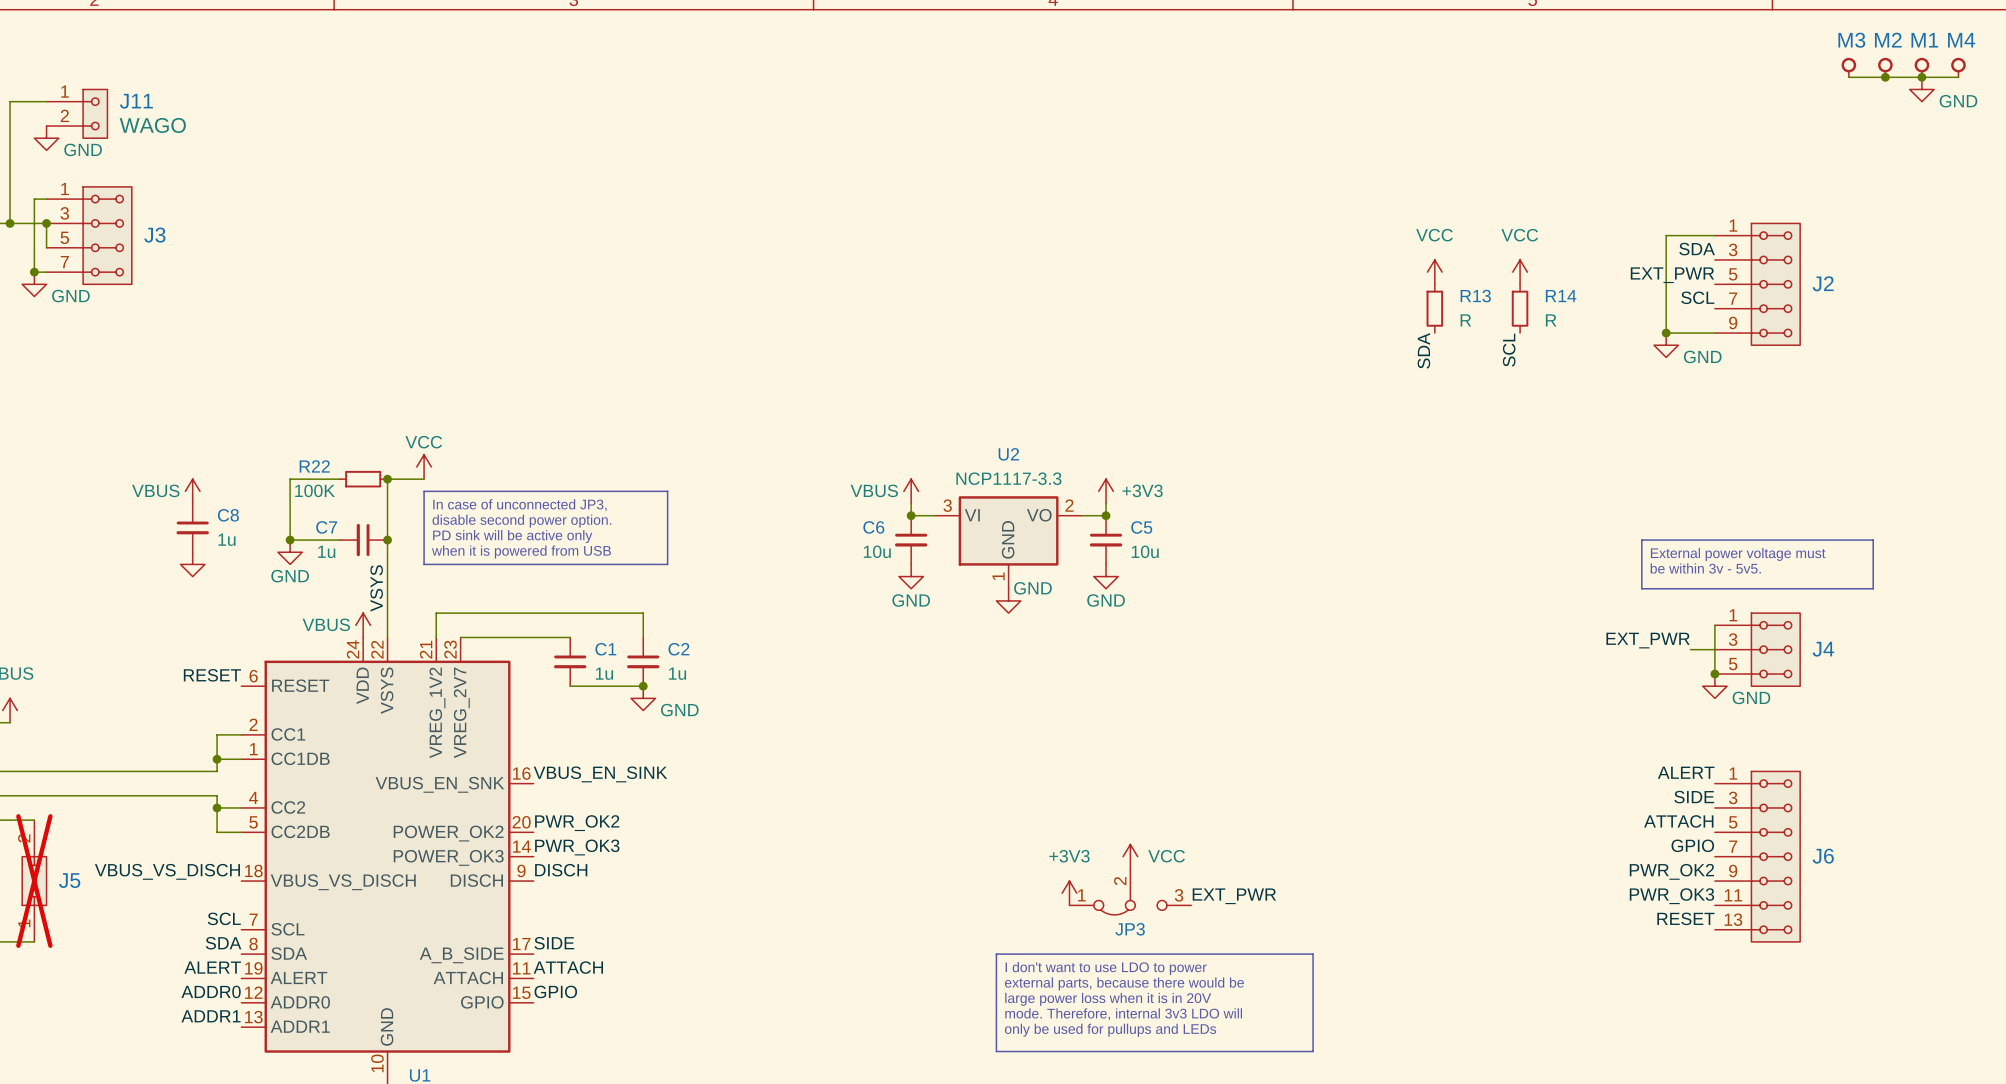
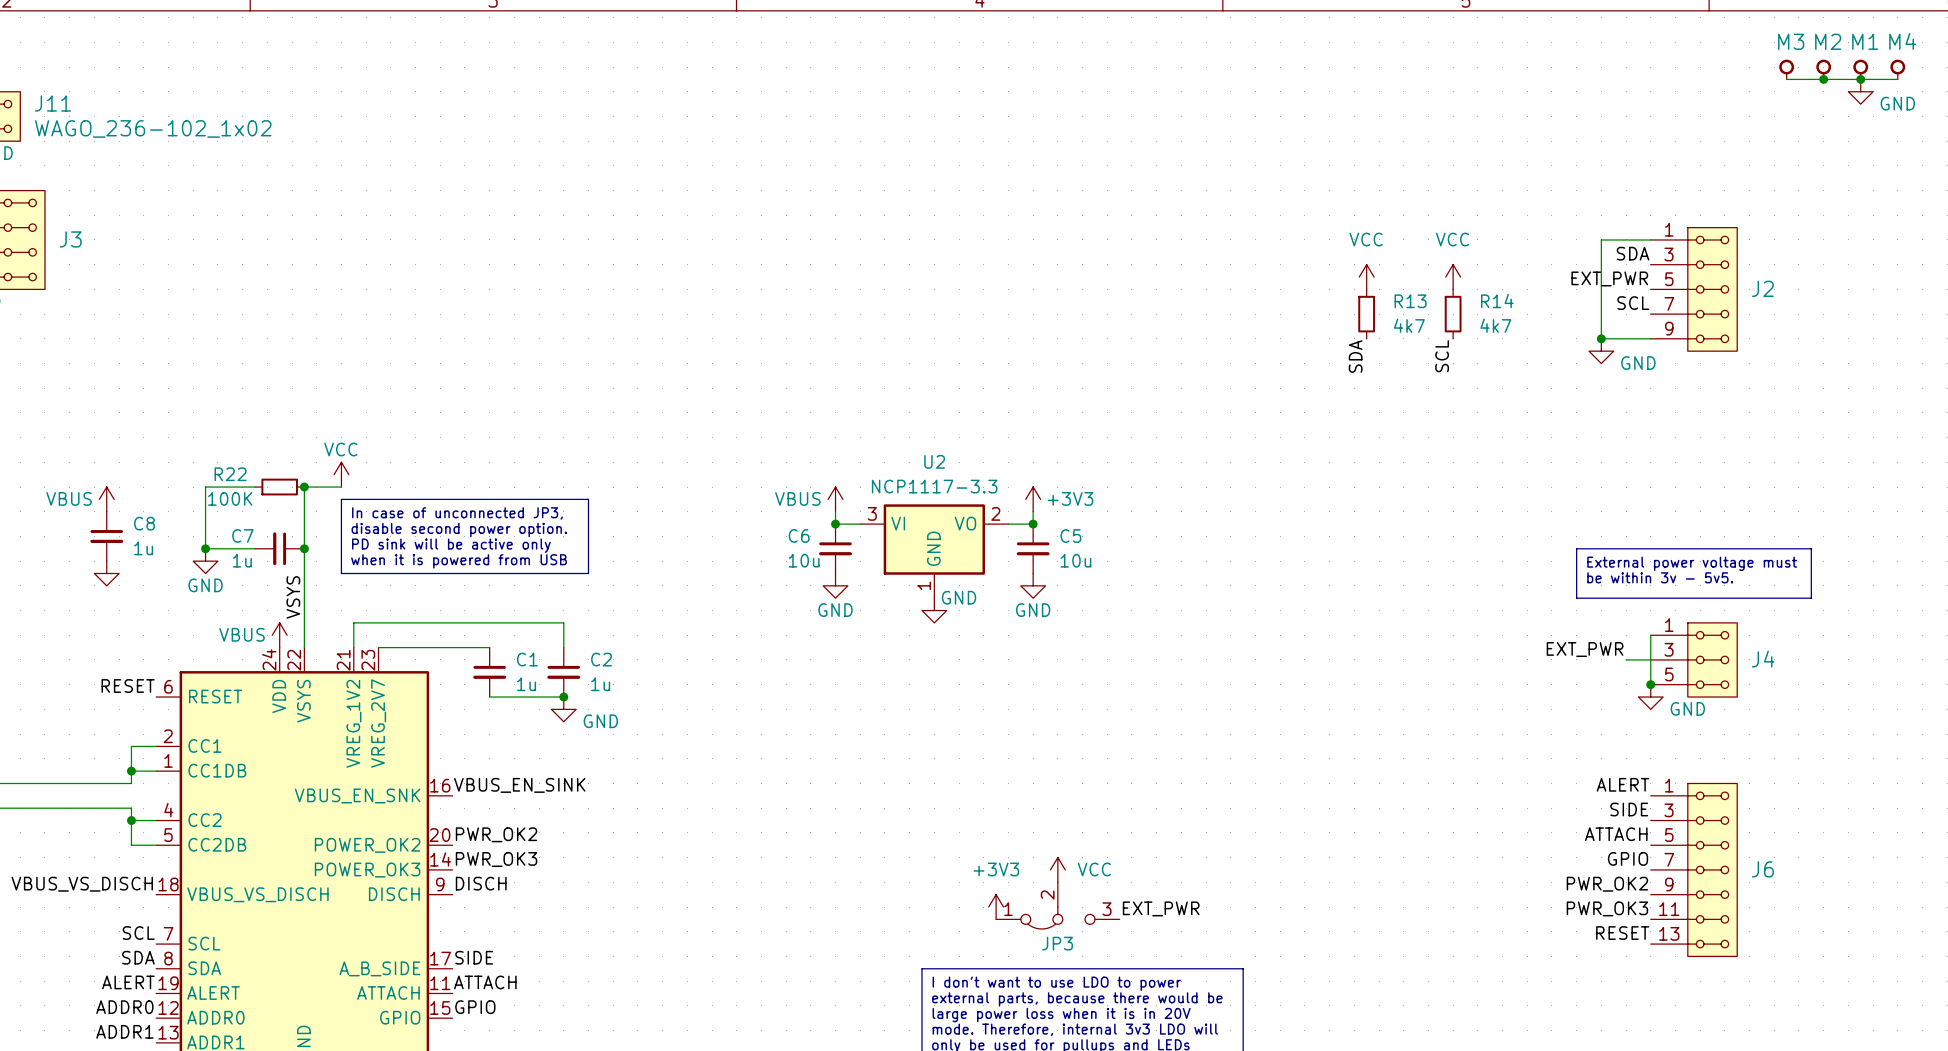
J11 value: WAGO (152, 125) -> WAGO_236-102_1x02 (153, 128)
R13 value: R (1465, 320) -> 4k7 (1409, 325)
R14 value: R (1551, 320) -> 4k7 (1495, 325)

